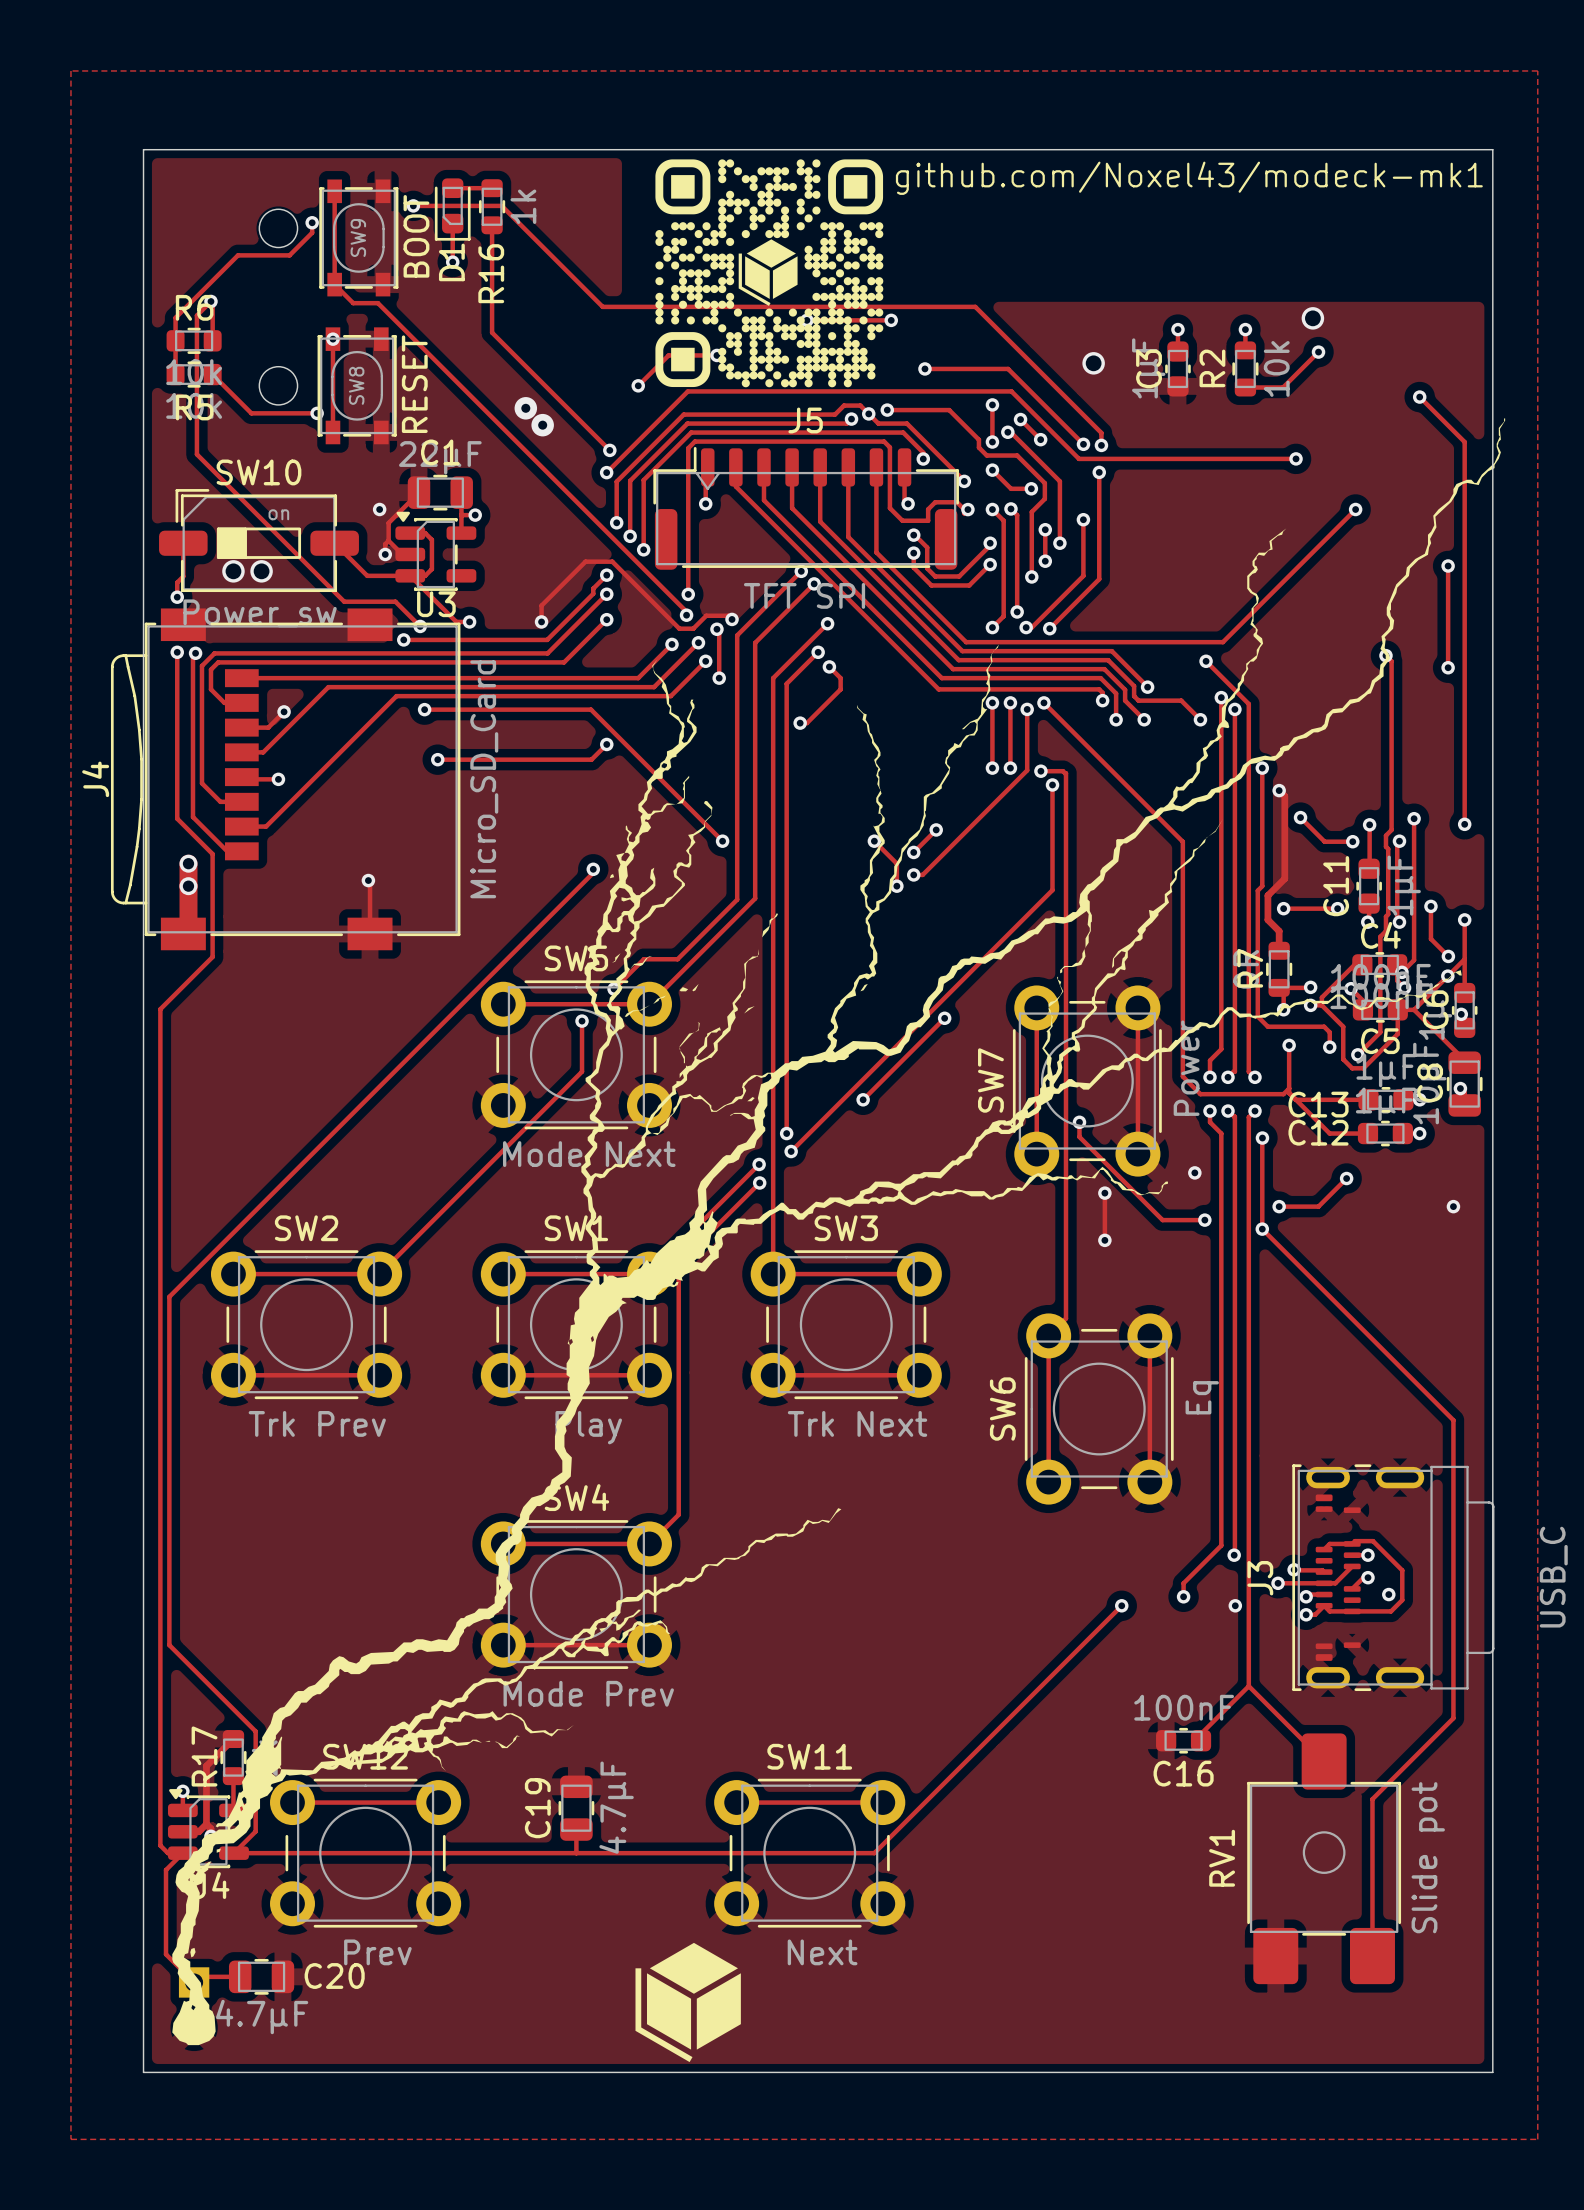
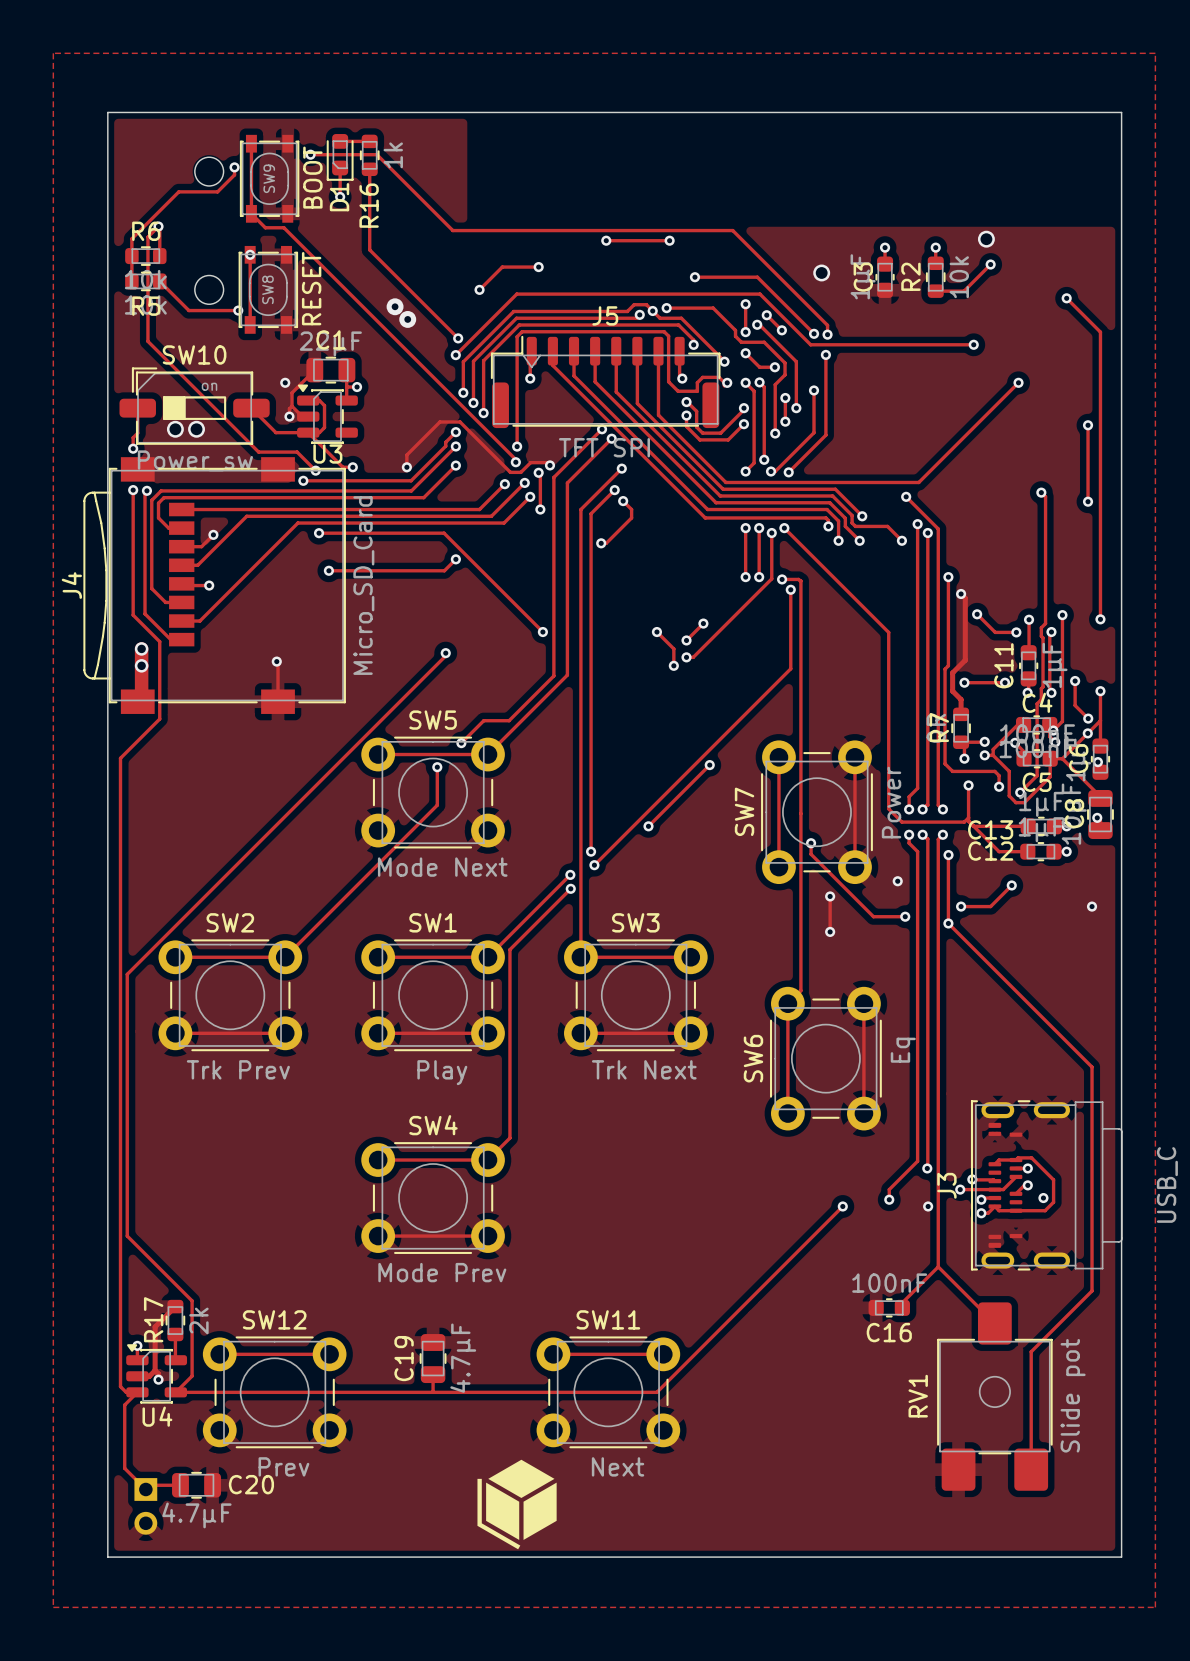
drawing: [655, 159, 884, 388] -> none
text: github.com/Noxel43/modeck-mk1 (1189, 178) -> none
drawing: [172, 418, 1506, 2046] -> none

